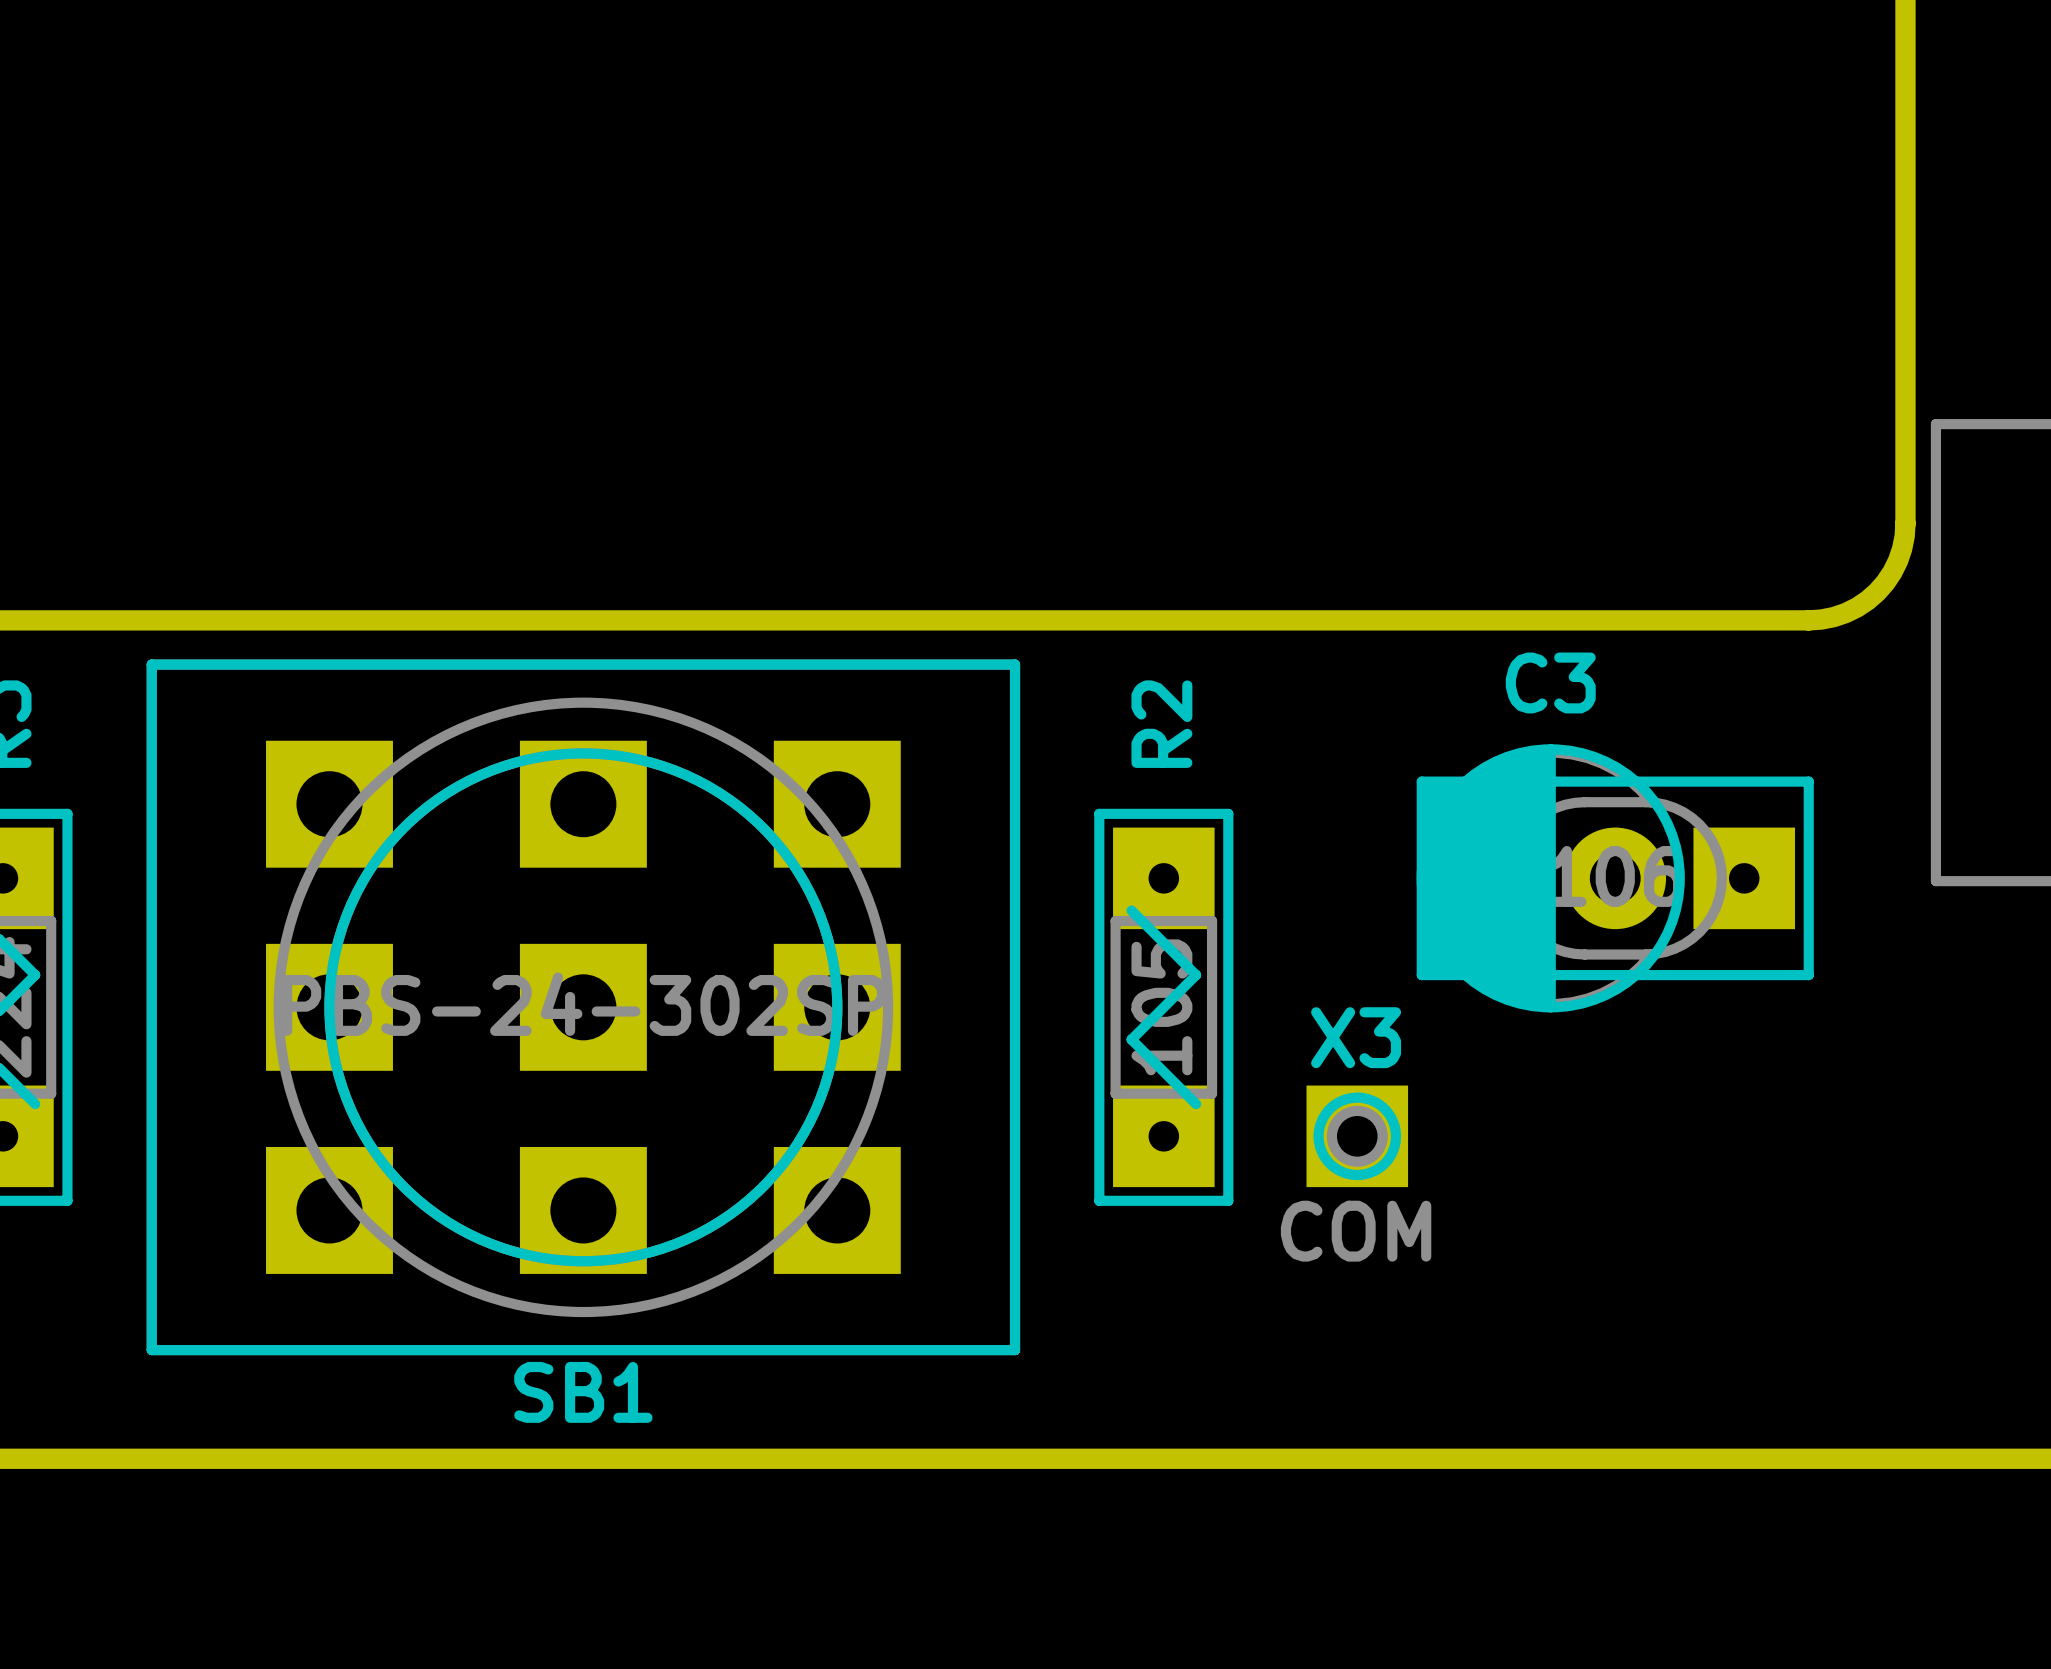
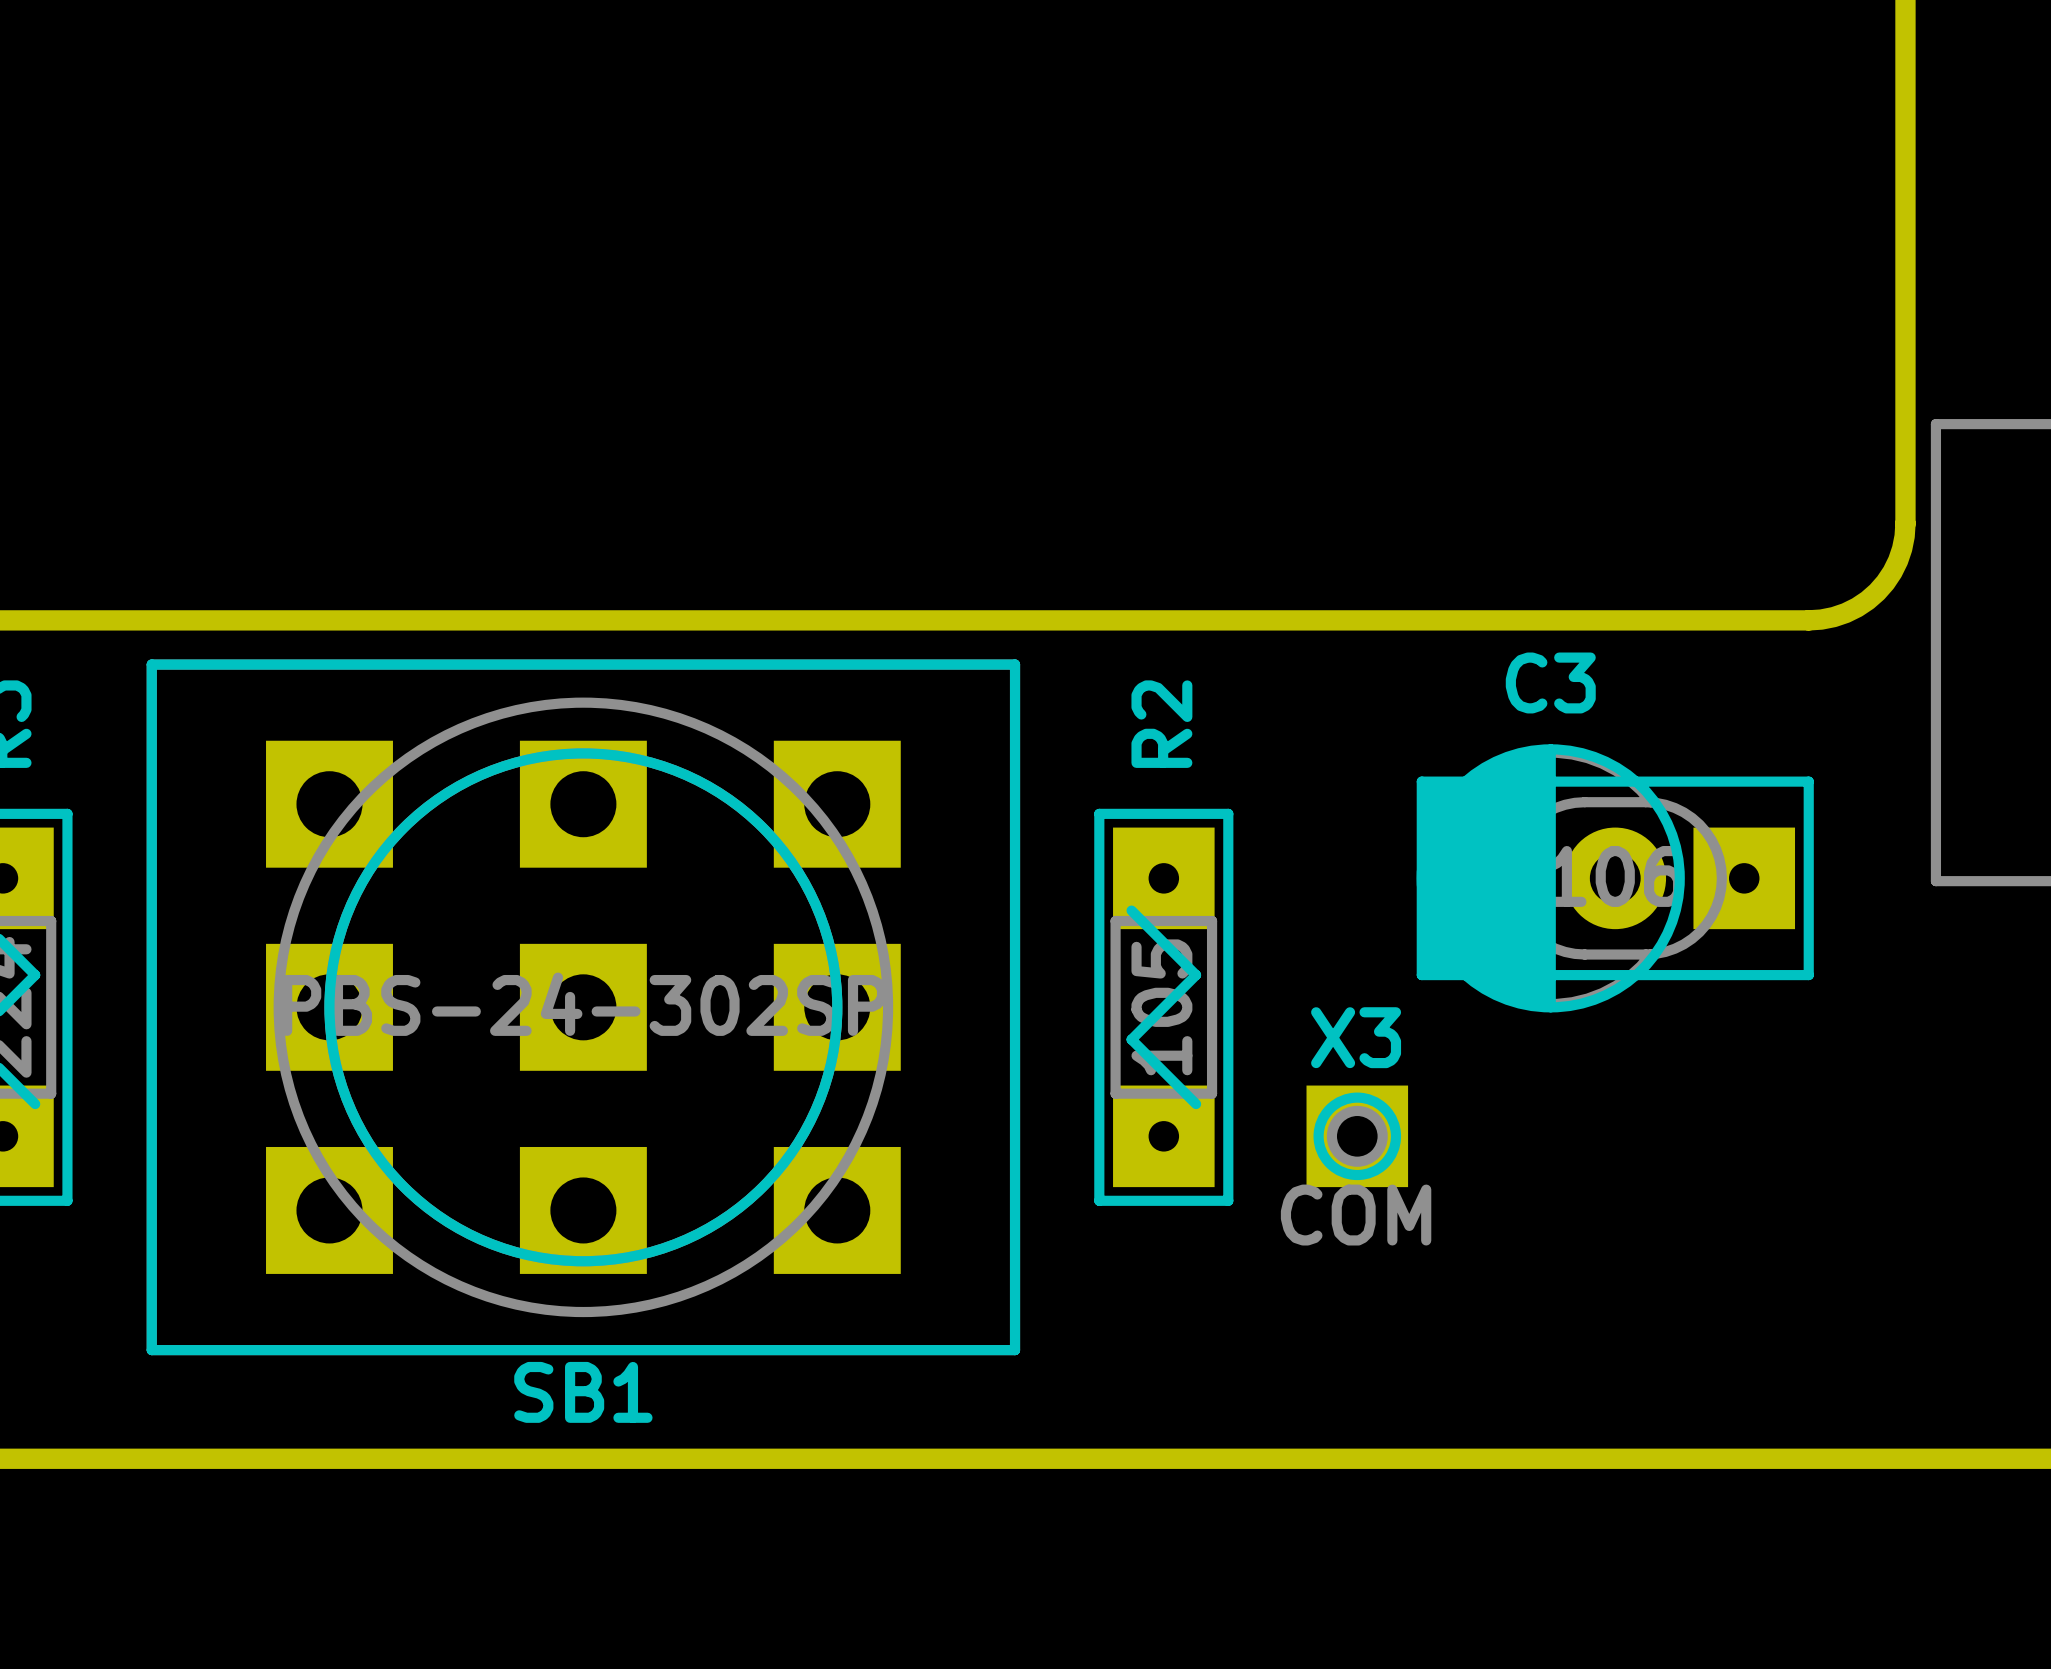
X3 value position: COM (1356, 1231) -> COM (1356, 1215)

